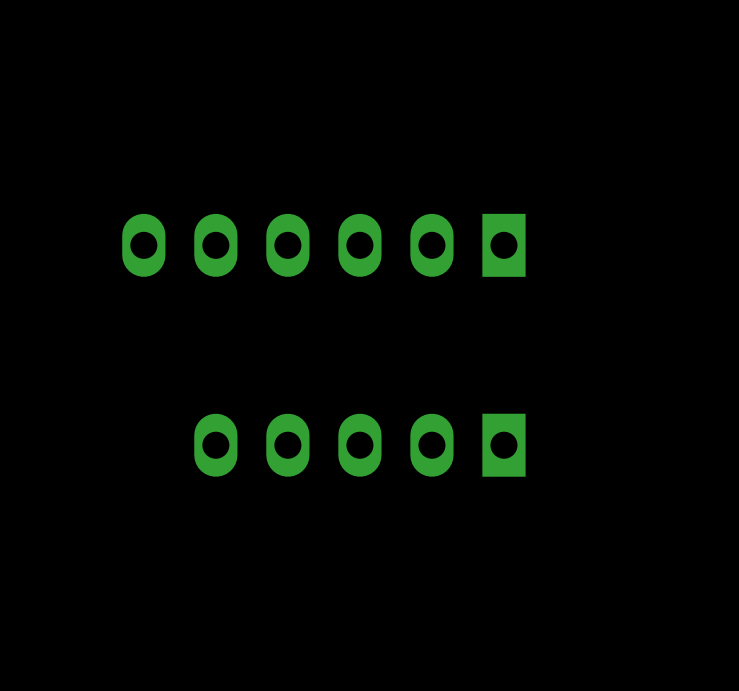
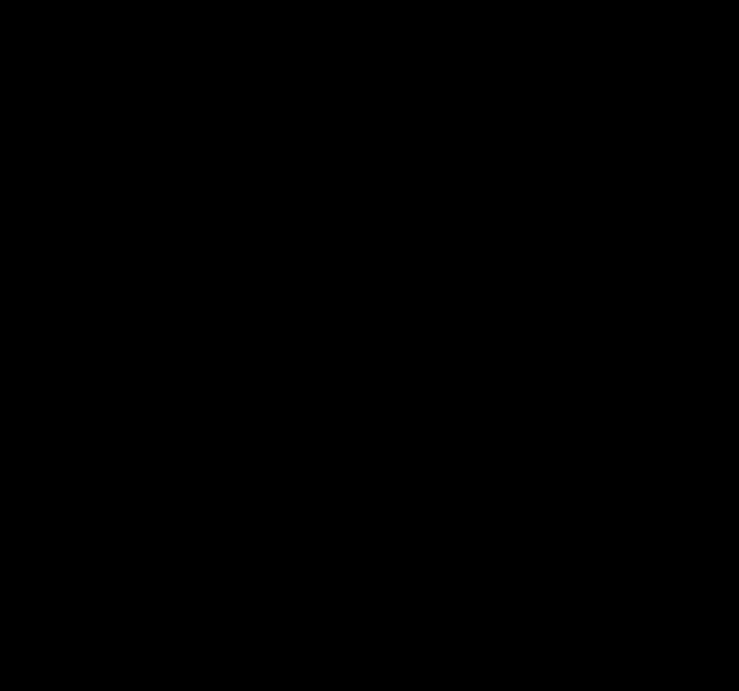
part: (323, 245) -> none
part: (359, 445) -> none

